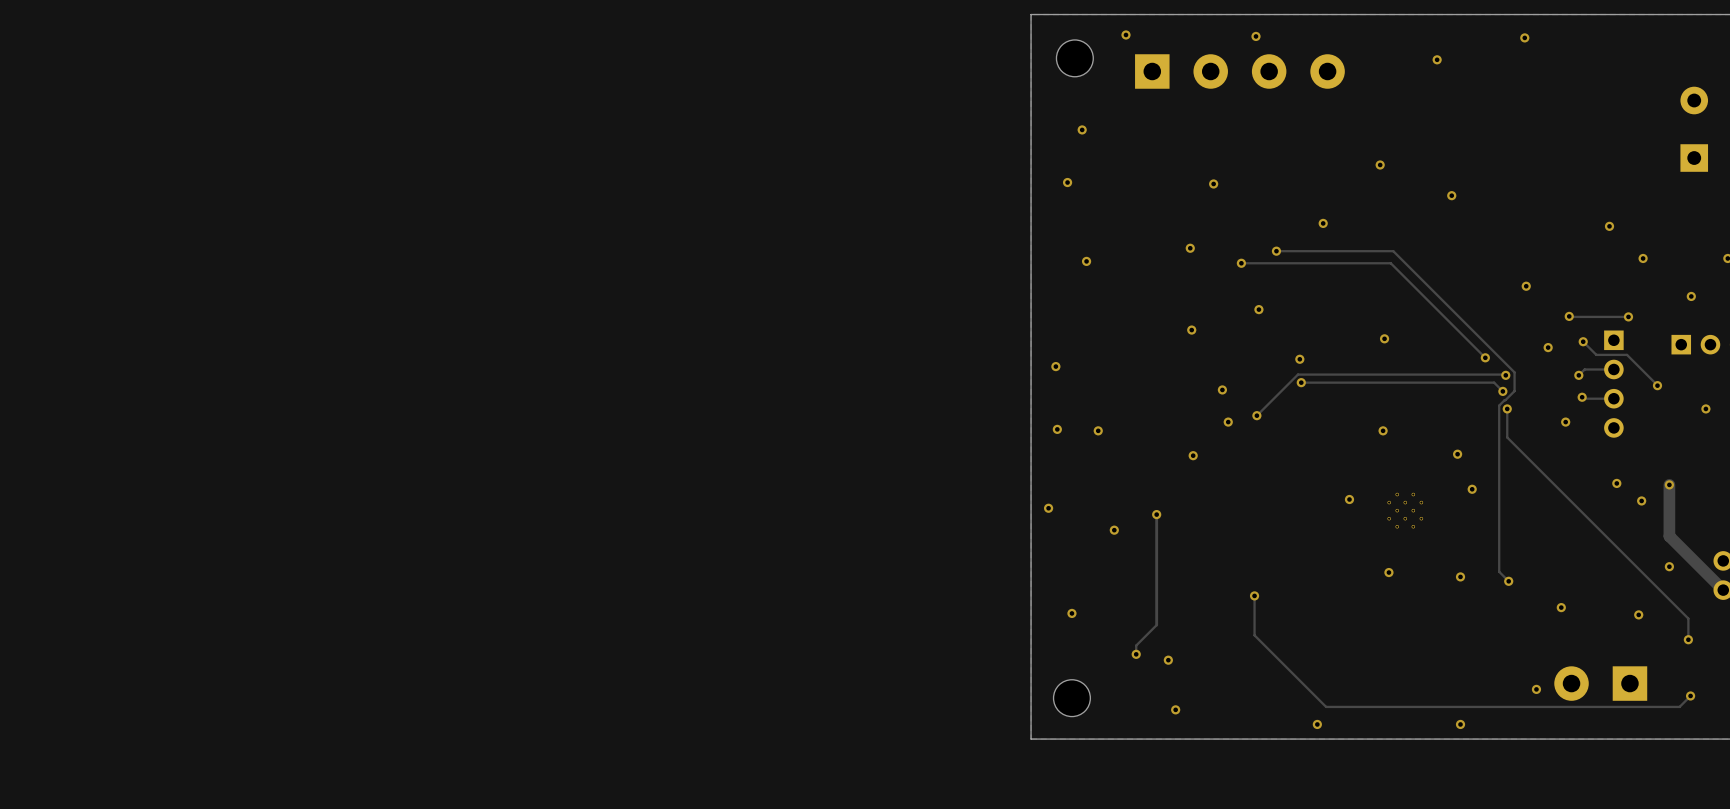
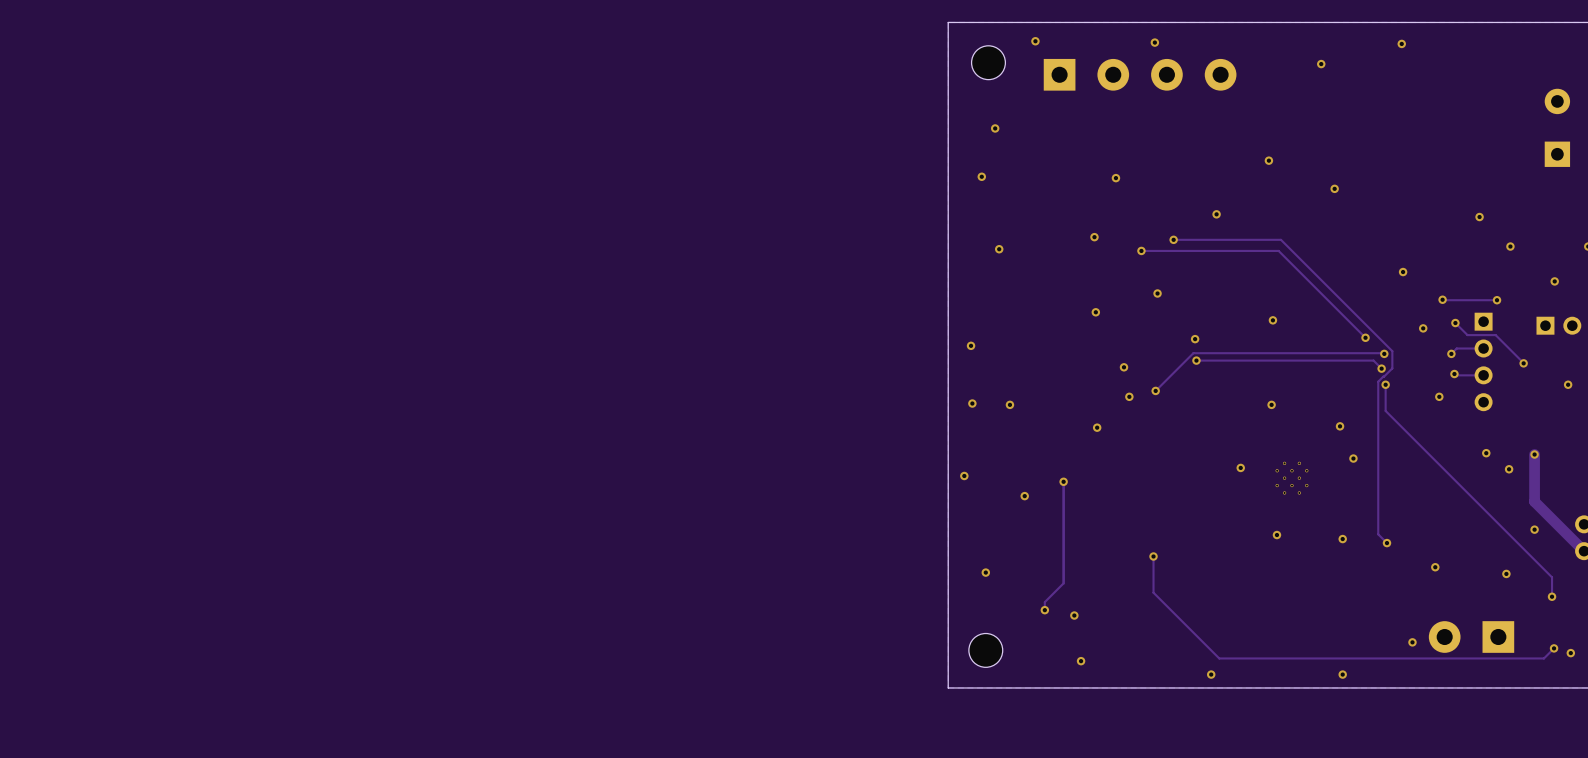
via: none -> (1570, 653)

